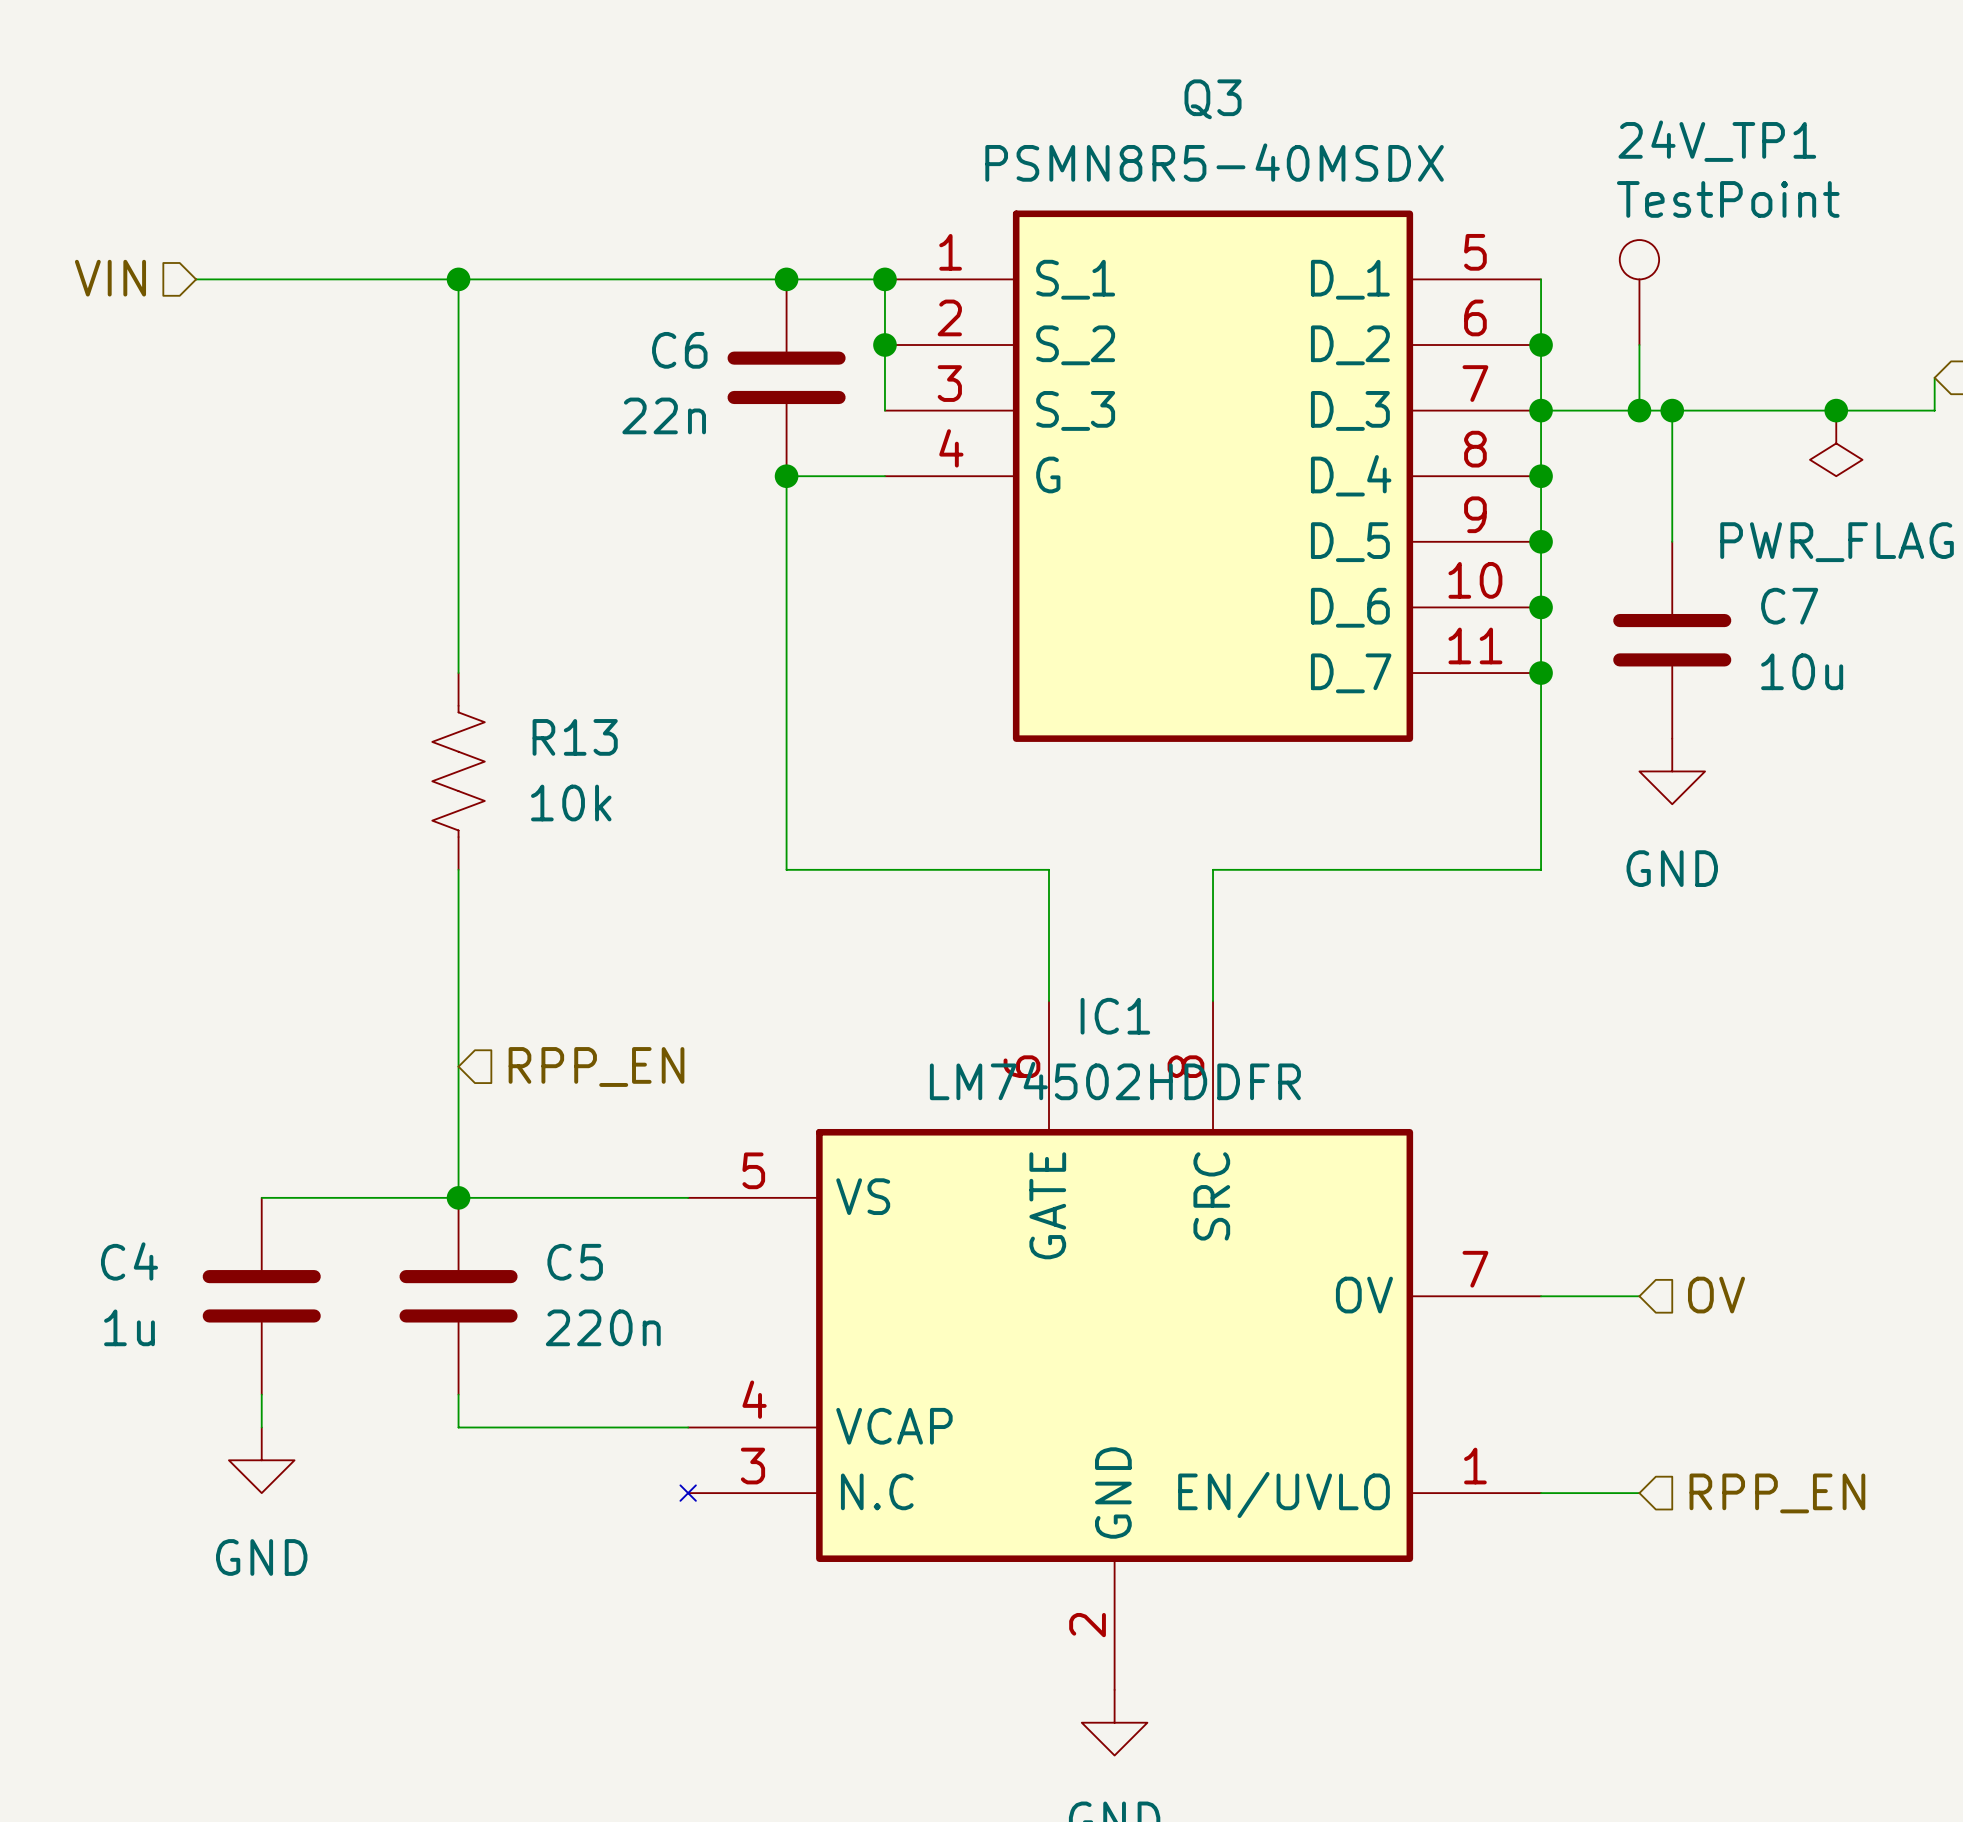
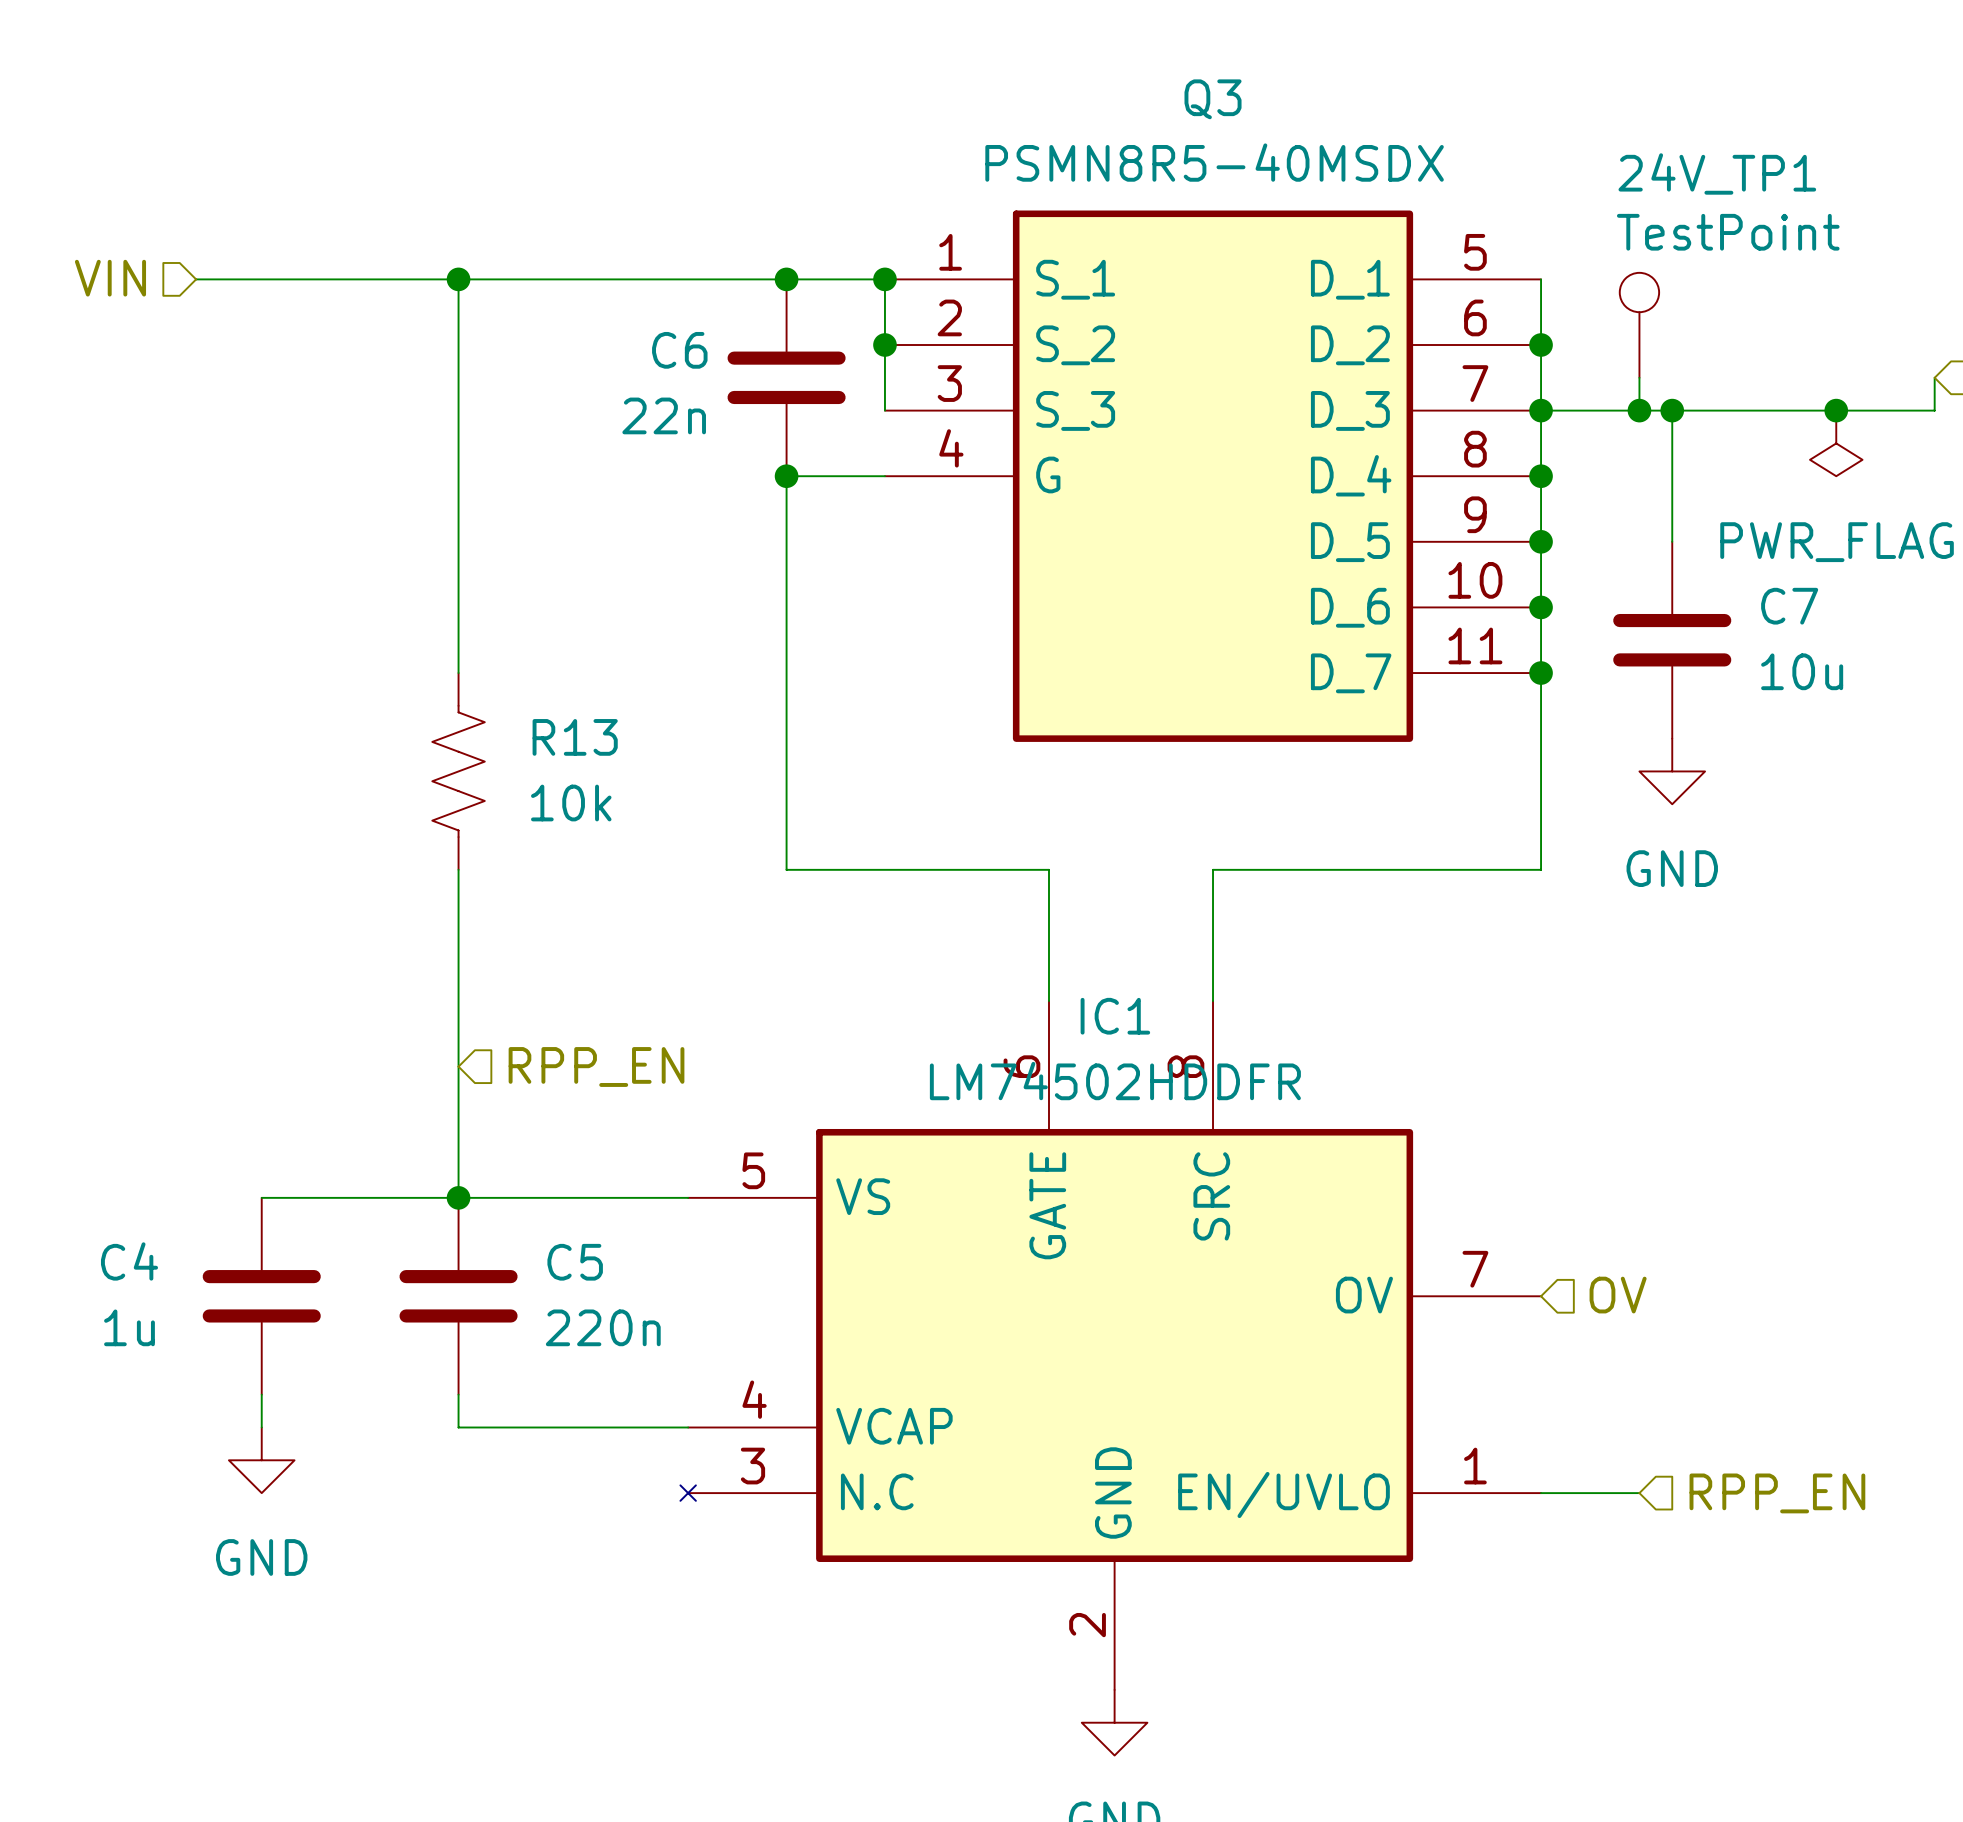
24V_TP1 position: (1639, 292) -> (1639, 325)
hierarchical label position: OV (1716, 1295) -> OV (1618, 1295)
wire: (1541, 1296) (1639, 1296) -> none

